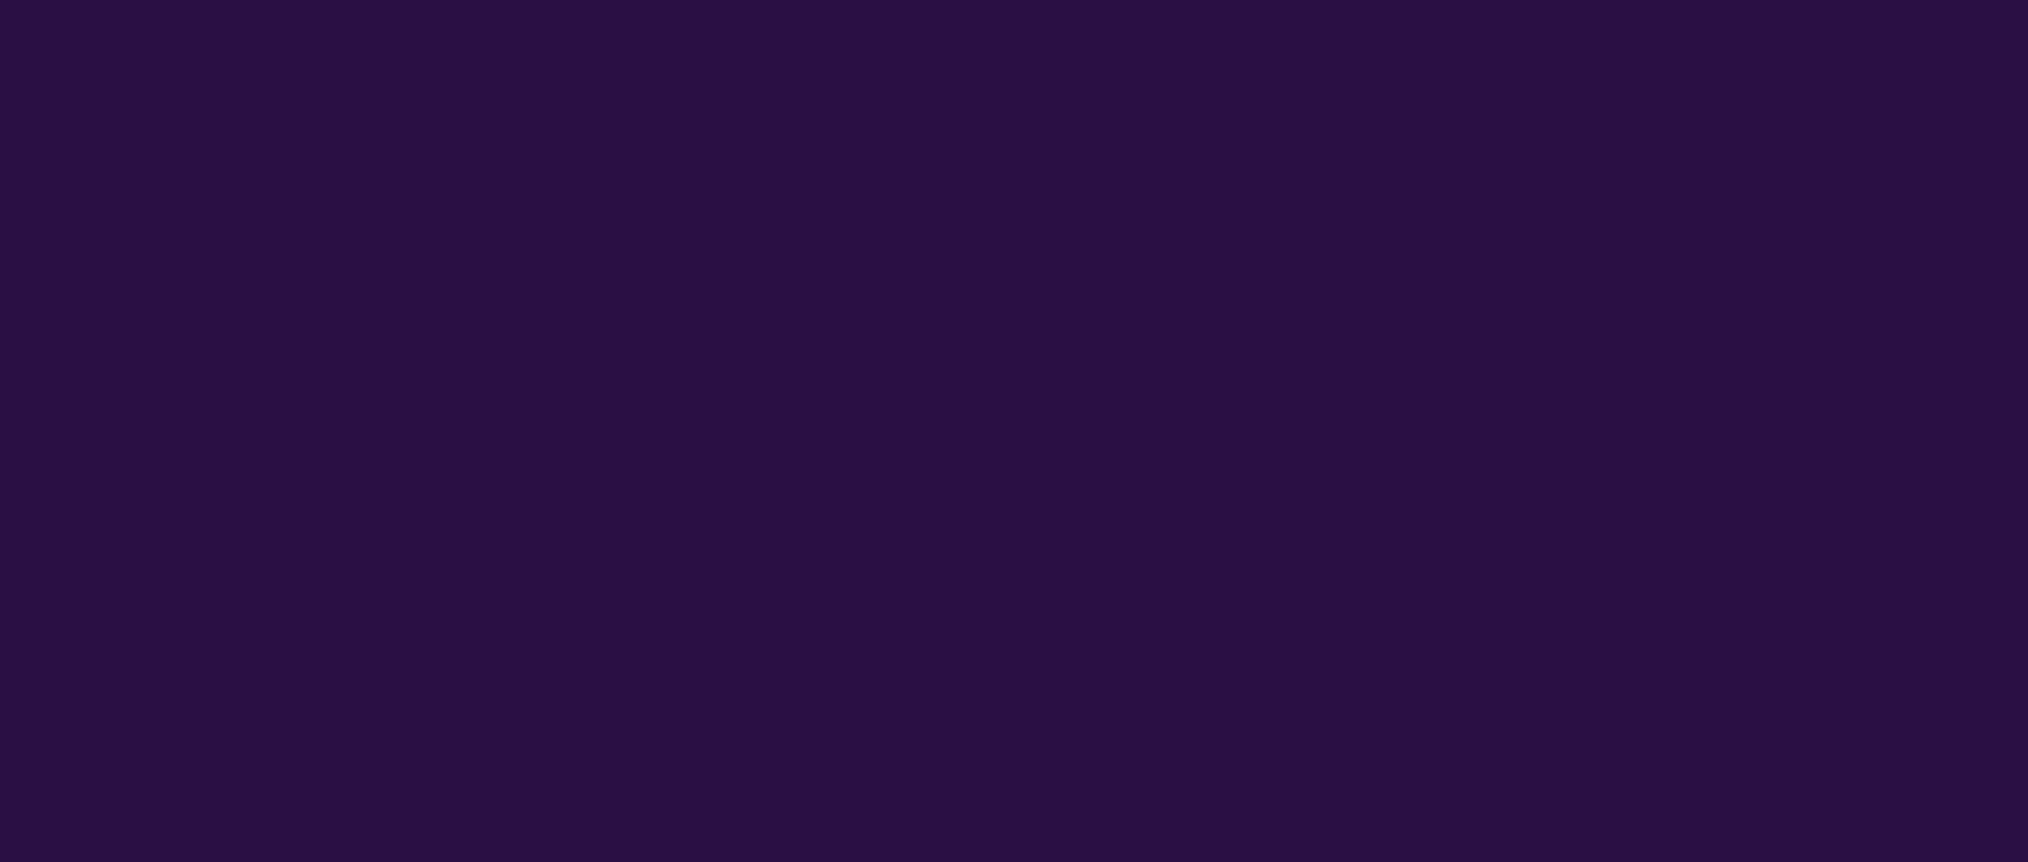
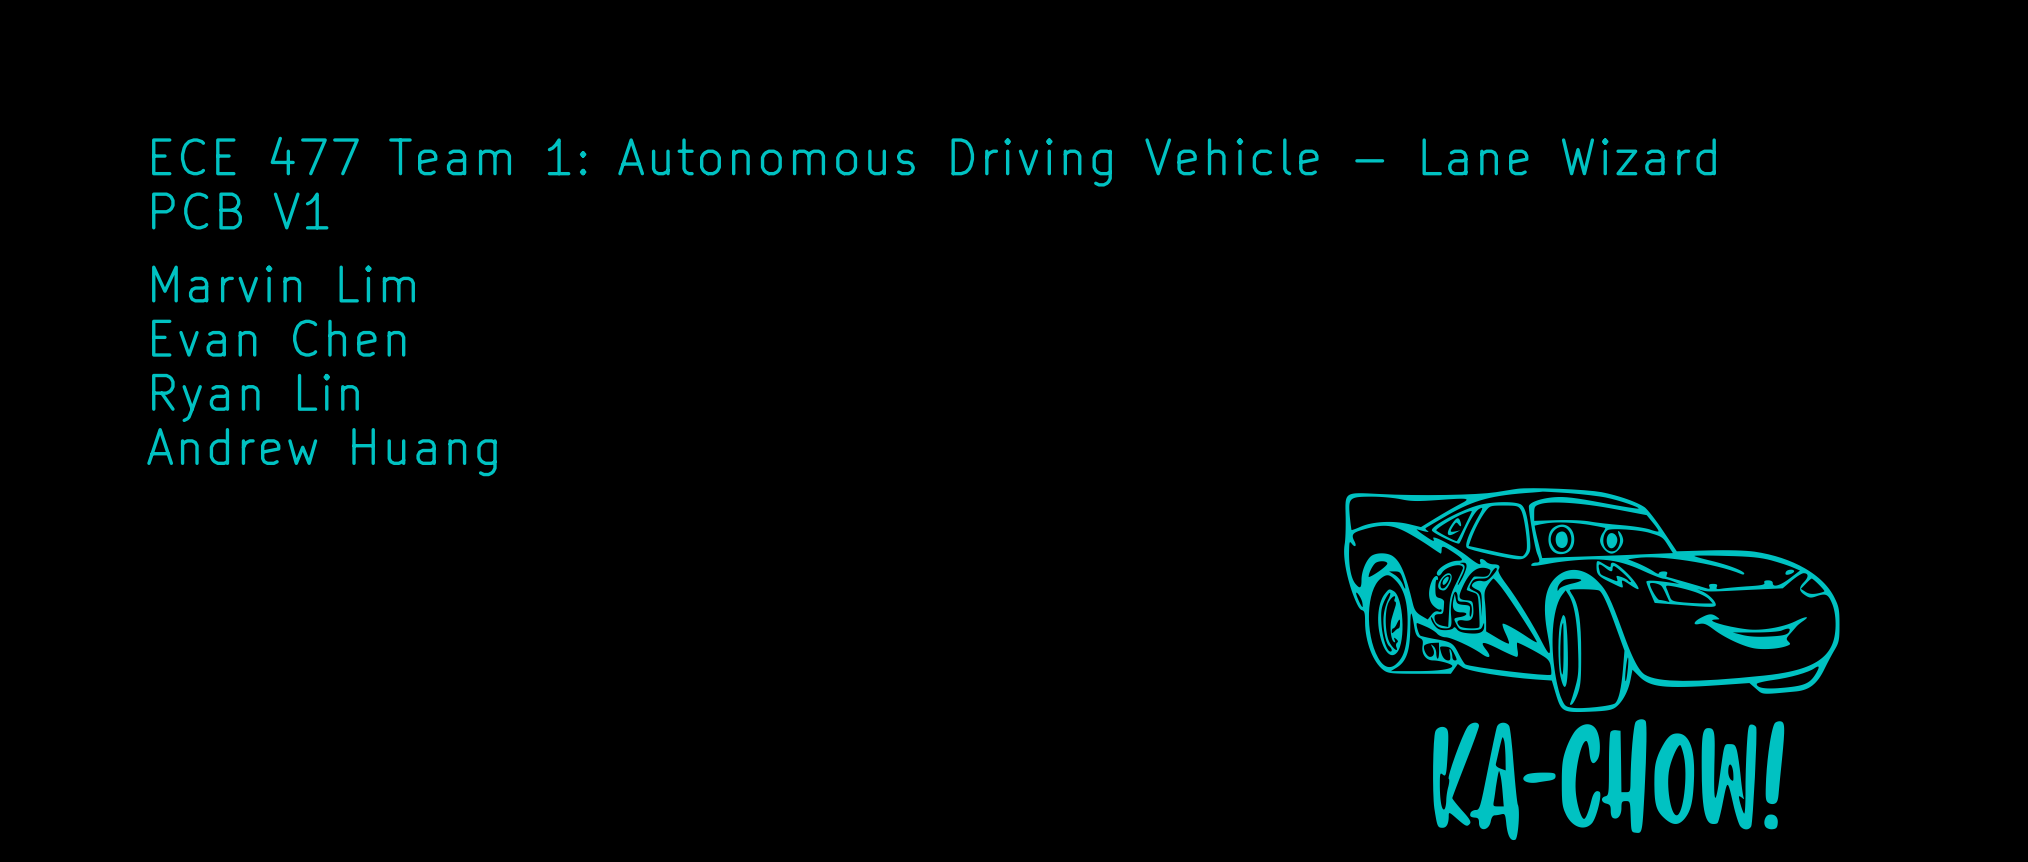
text: none -> ECE 477 Team 1: Autonomous Driving Vehicle - Lane Wizard (933, 161)
text: none -> PCB V1 (240, 211)
text: none -> Marvin Lim (283, 284)
text: none -> Evan Chen (278, 338)
text: none -> Ryan Lin (255, 397)
text: none -> Andrew Huang (321, 452)
drawing: none -> [1344, 488, 1840, 841]

